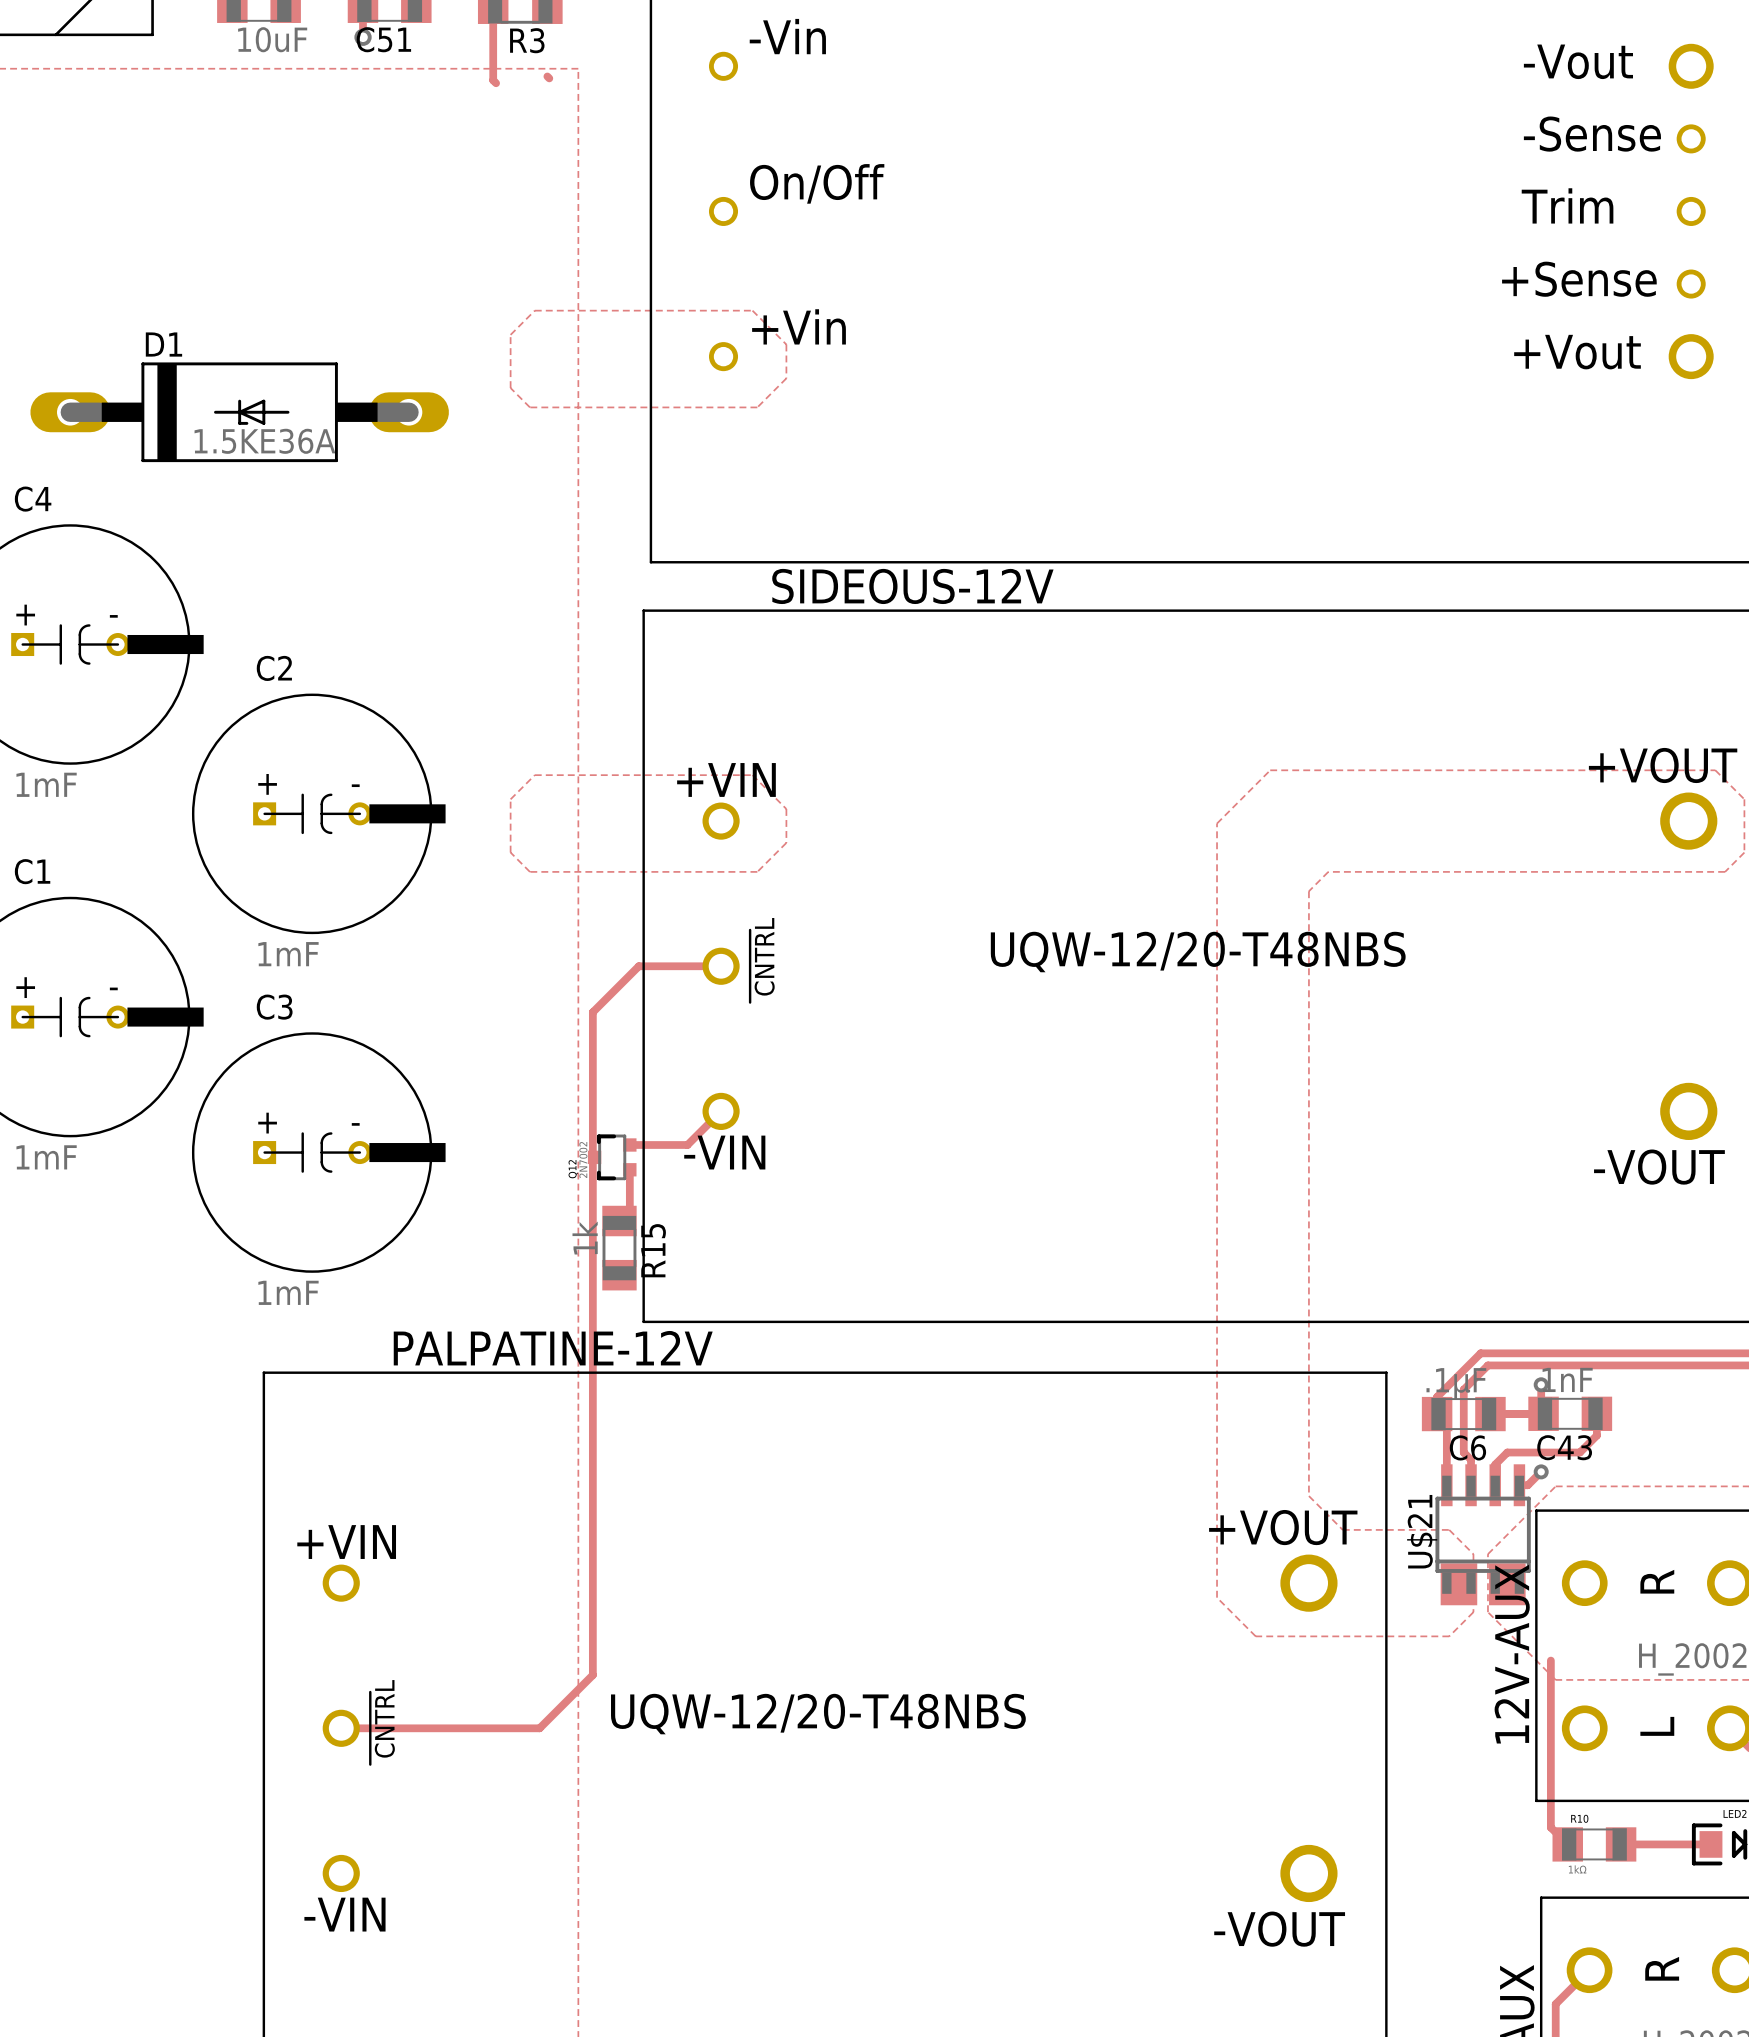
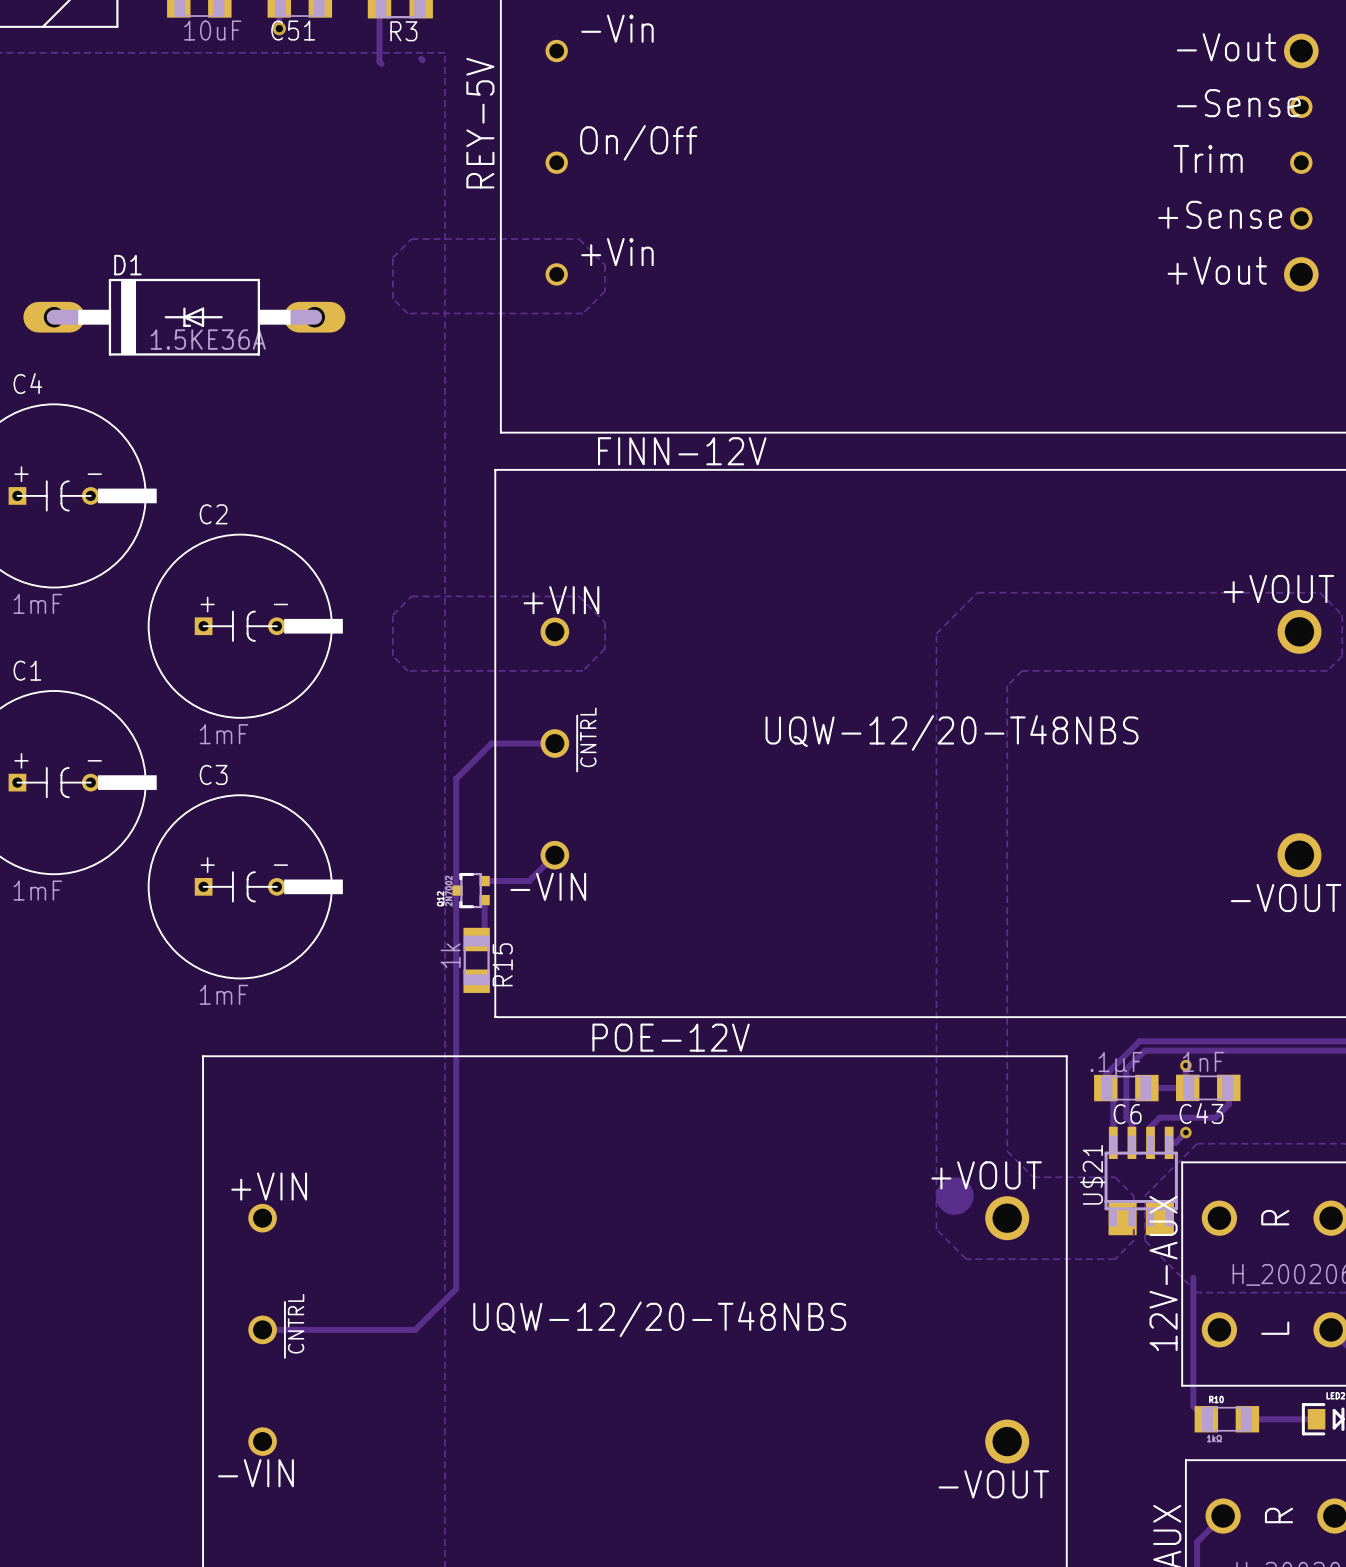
text: none -> REY-5V (480, 123)
SIDEOUS-12V name: SIDEOUS-12V (912, 586) -> FINN-12V (682, 451)
PALPATINE-12V name: PALPATINE-12V (553, 1348) -> POE-12V (671, 1037)
track: none -> (955, 1195) (954, 1196)

